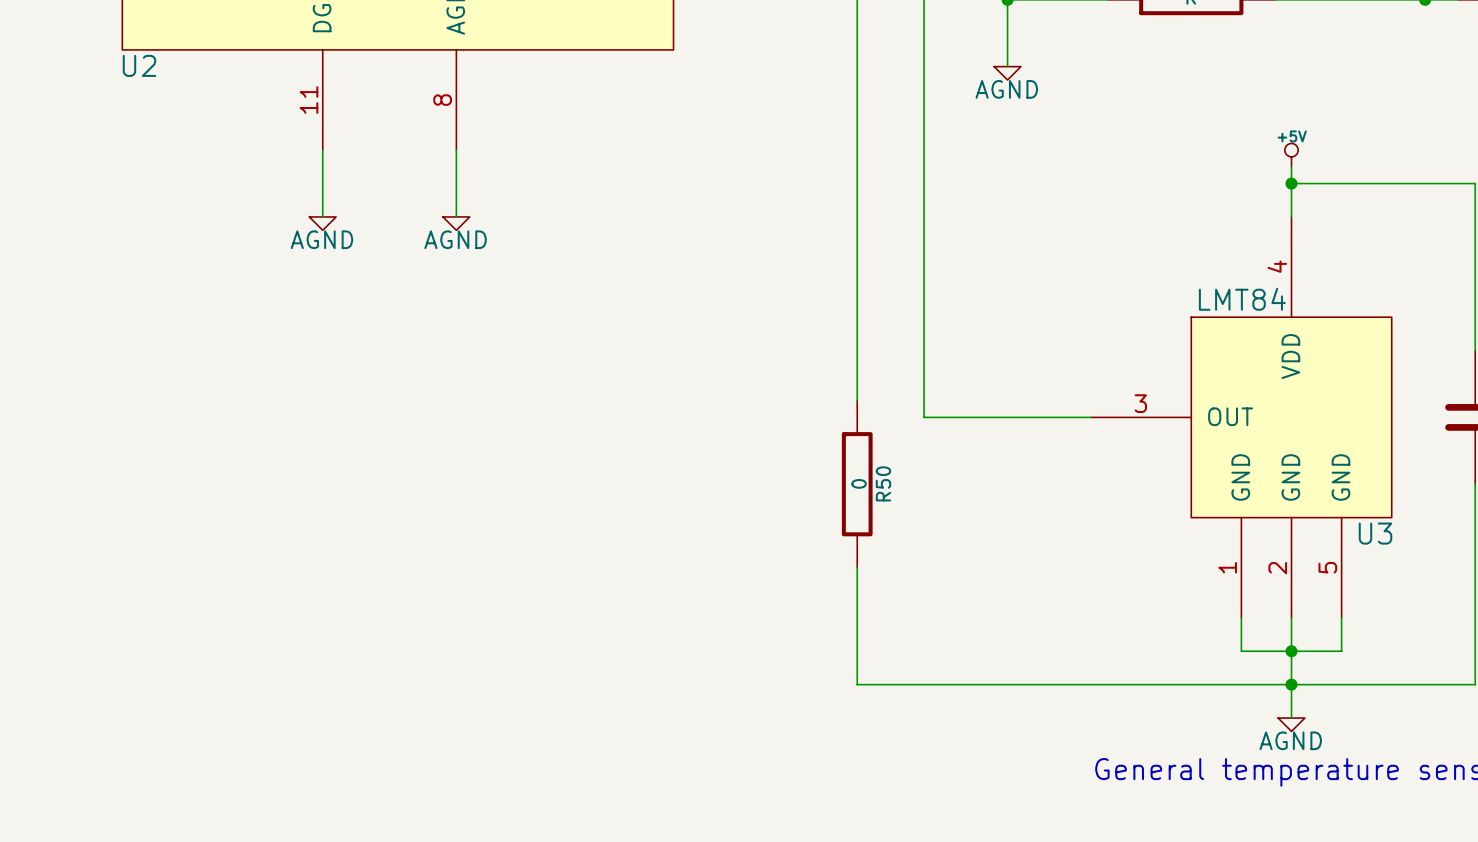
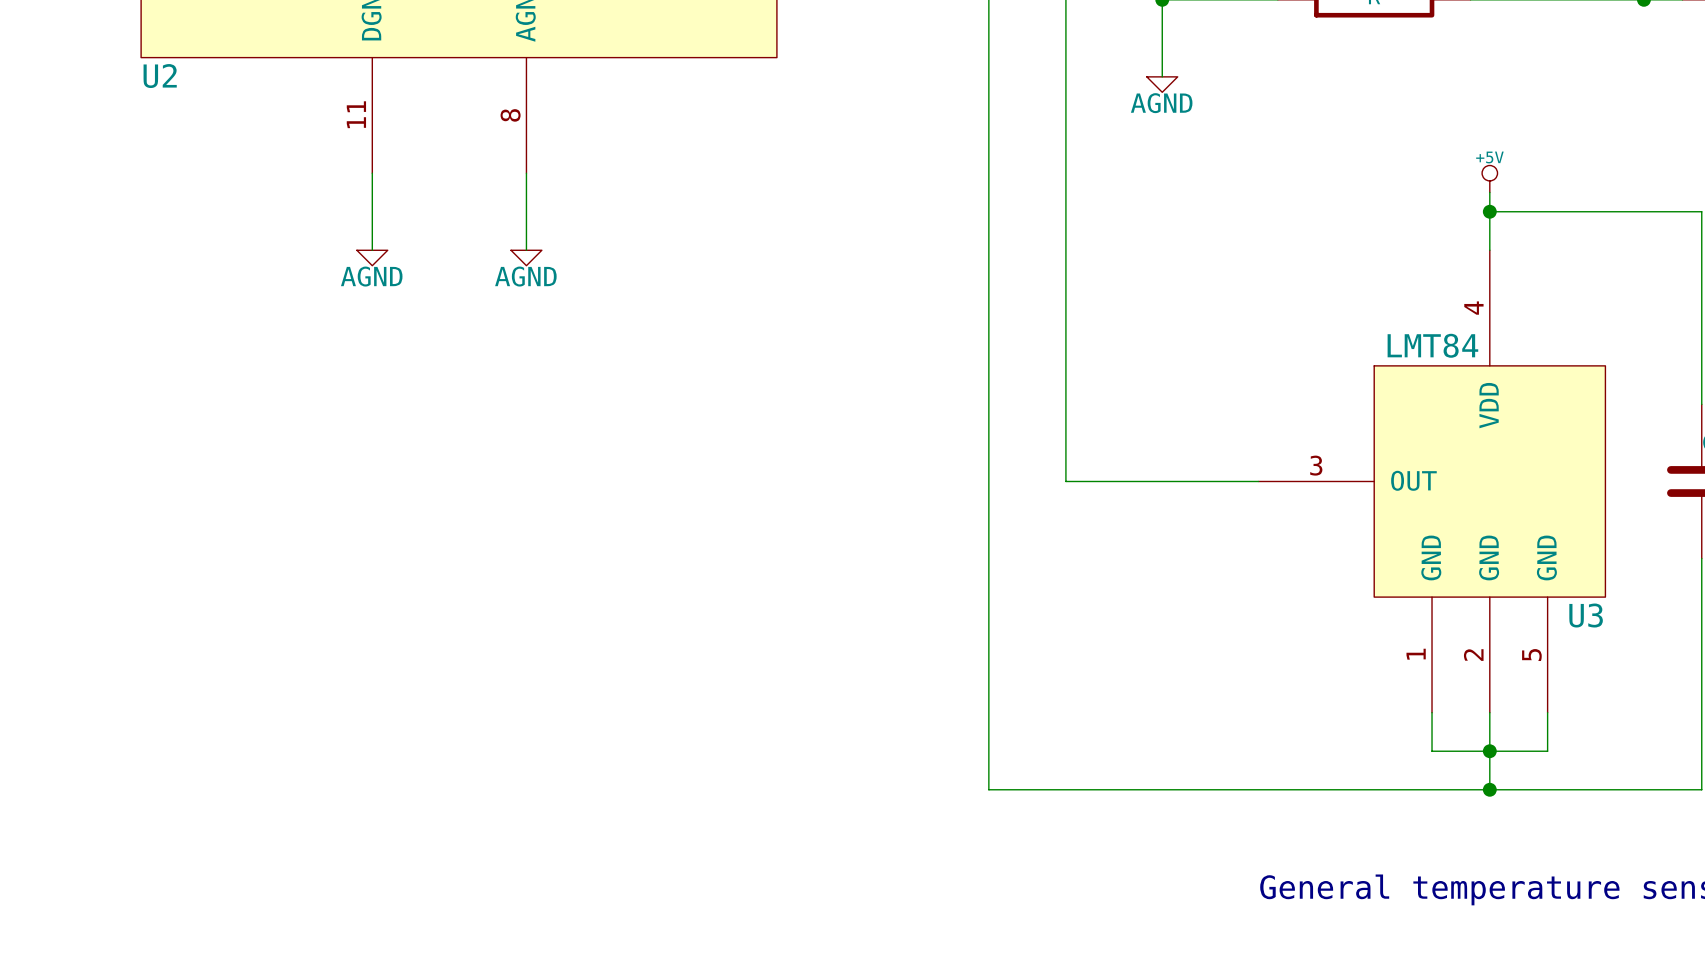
wire: none -> (988, 462) (988, 654)
R50: 0 (857, 484) -> none
wire: (1291, 684) (1291, 718) -> none
power symbol: AGND (1291, 724) -> none

